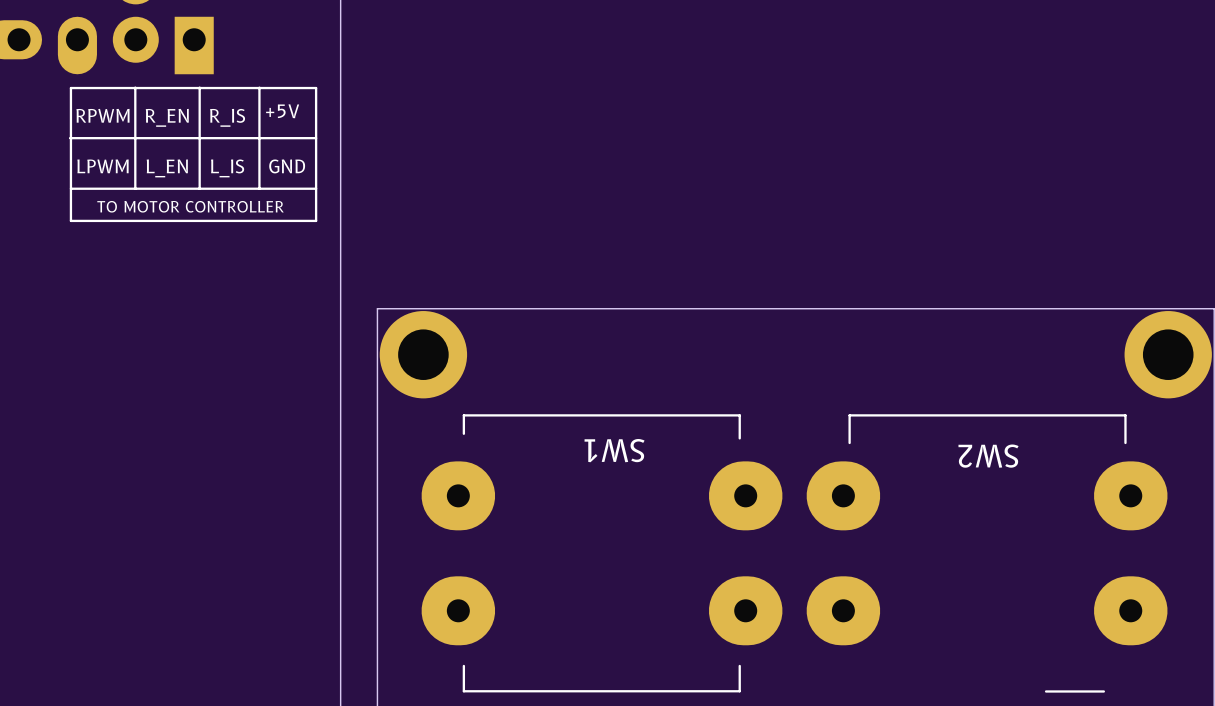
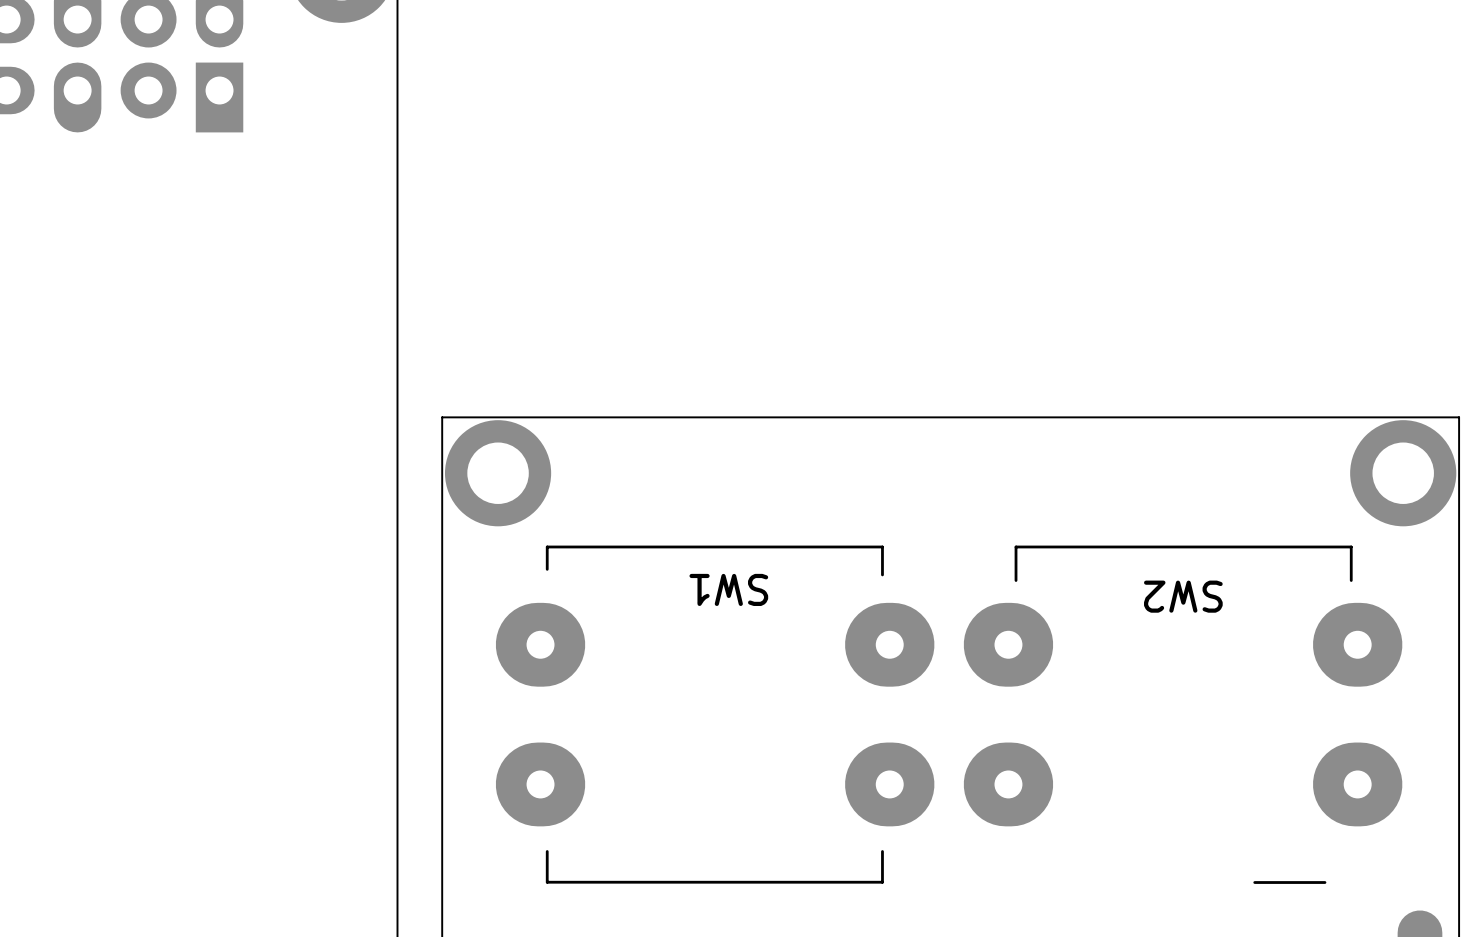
line: (135, 87) (135, 188) -> none
line: (199, 87) (199, 188) -> none
line: (259, 87) (259, 188) -> none
line: (316, 88) (70, 88) (70, 220) (316, 220) (316, 88) -> none
text: +5V (282, 111) -> none
text: RPWM (102, 115) -> none
text: R_EN (167, 117) -> none
text: R_IS (227, 117) -> none
line: (316, 138) (70, 138) -> none
text: LPWM (102, 166) -> none
text: GND (287, 166) -> none
text: L_EN (167, 168) -> none
text: L_IS (227, 168) -> none
line: (316, 188) (70, 188) -> none
text: TO MOTOR CONTROLLER (190, 206) -> none

